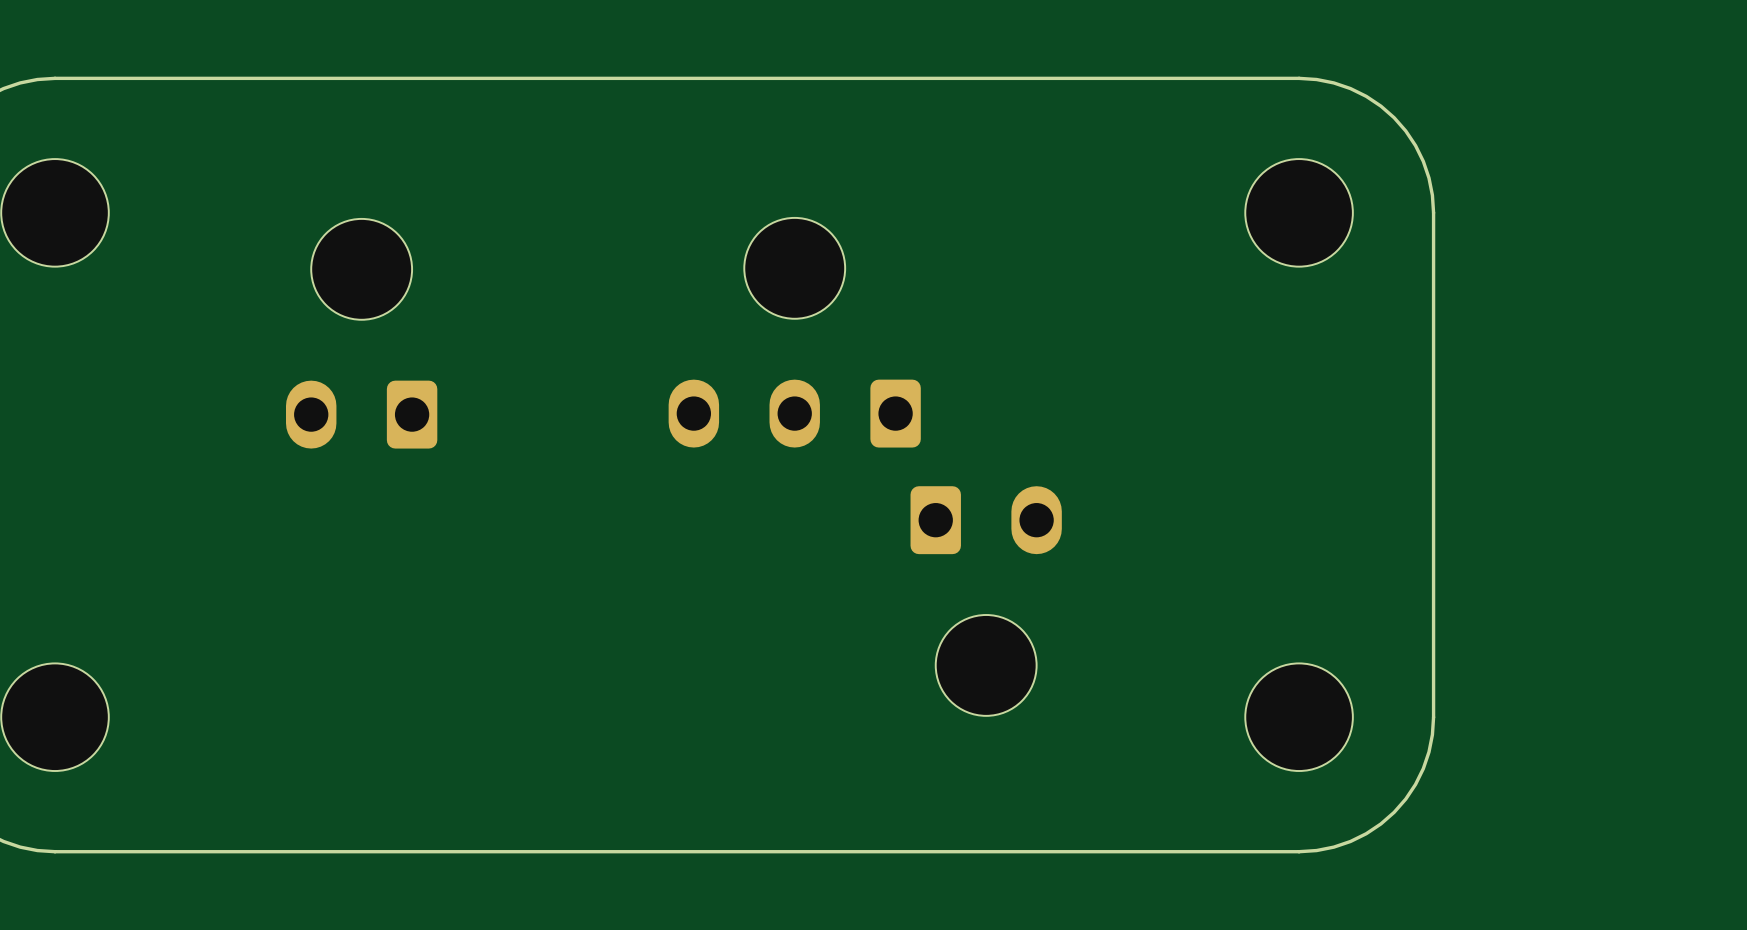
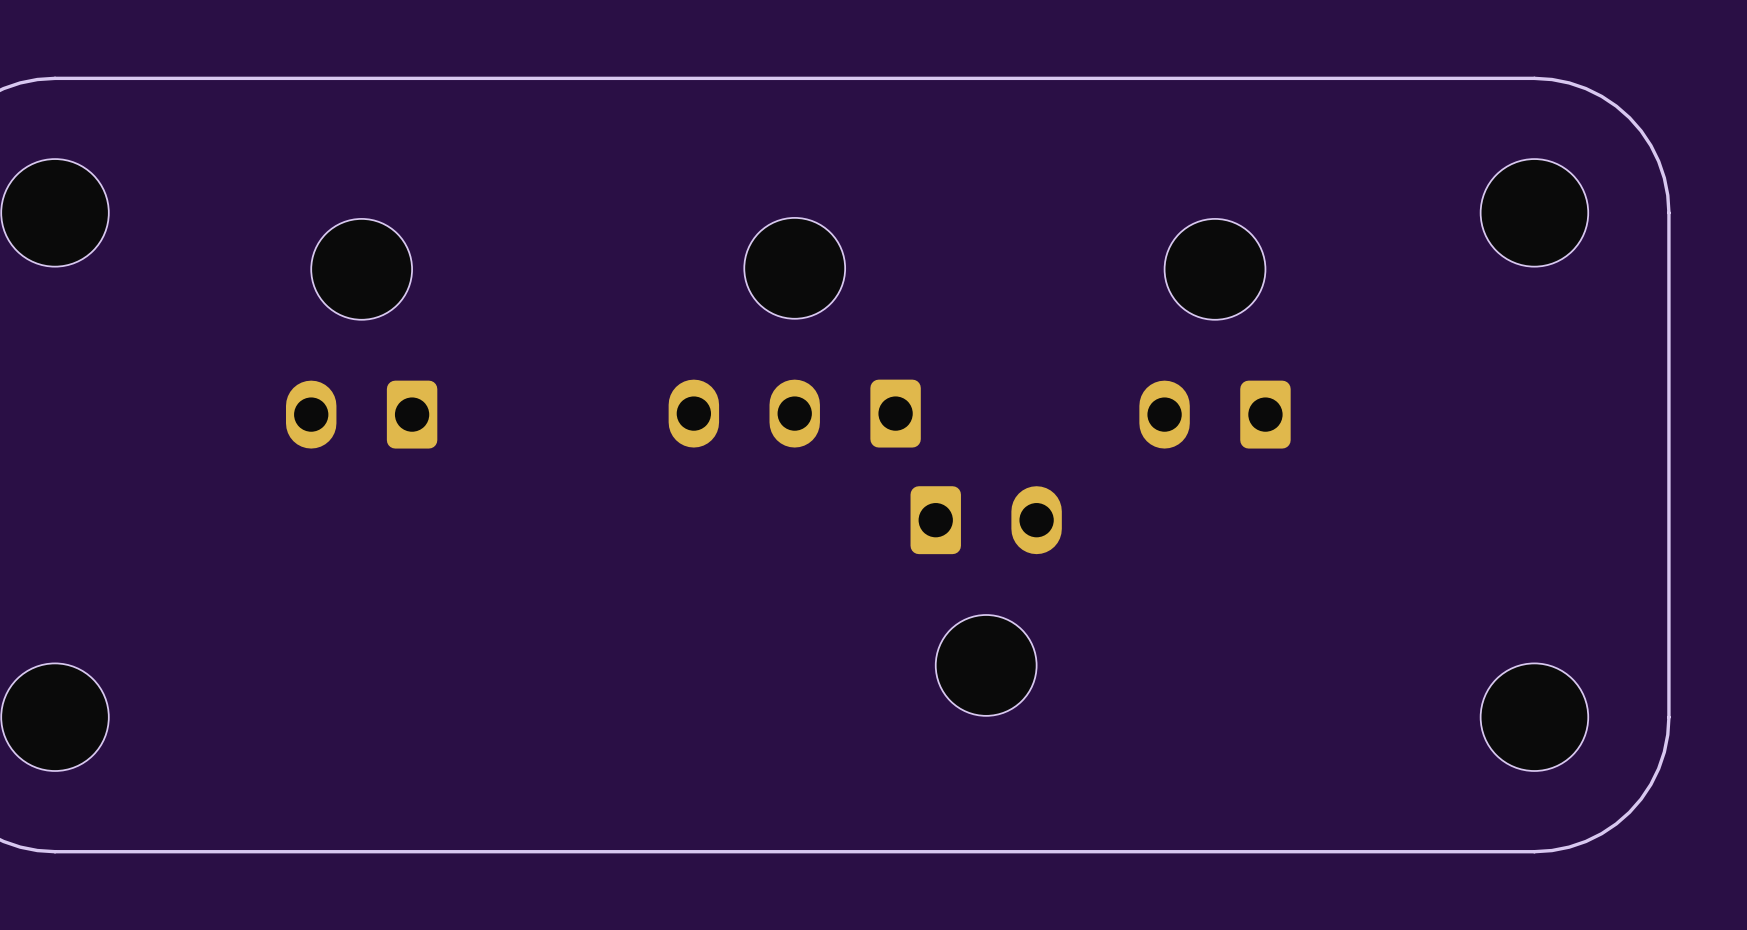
board edge: (1299, 78) (1316, 79) (1350, 88) (1380, 106) (1394, 117) (1415, 145) (1423, 161) (1428, 178) (1433, 212) (1433, 717) (1428, 752) (1423, 768) (1405, 799) (1380, 823) (1350, 841) (1316, 850) (1299, 851) -> (1299, 78) (1534, 78) (1551, 79) (1585, 88) (1616, 106) (1641, 130) (1650, 145) (1664, 178) (1668, 212) (1668, 717) (1664, 752) (1650, 784) (1629, 812) (1616, 823) (1585, 841) (1551, 850) (1299, 851)
part position: (1299, 212) -> (1534, 212)
part: none -> (1215, 333)
part position: (1299, 717) -> (1534, 717)

